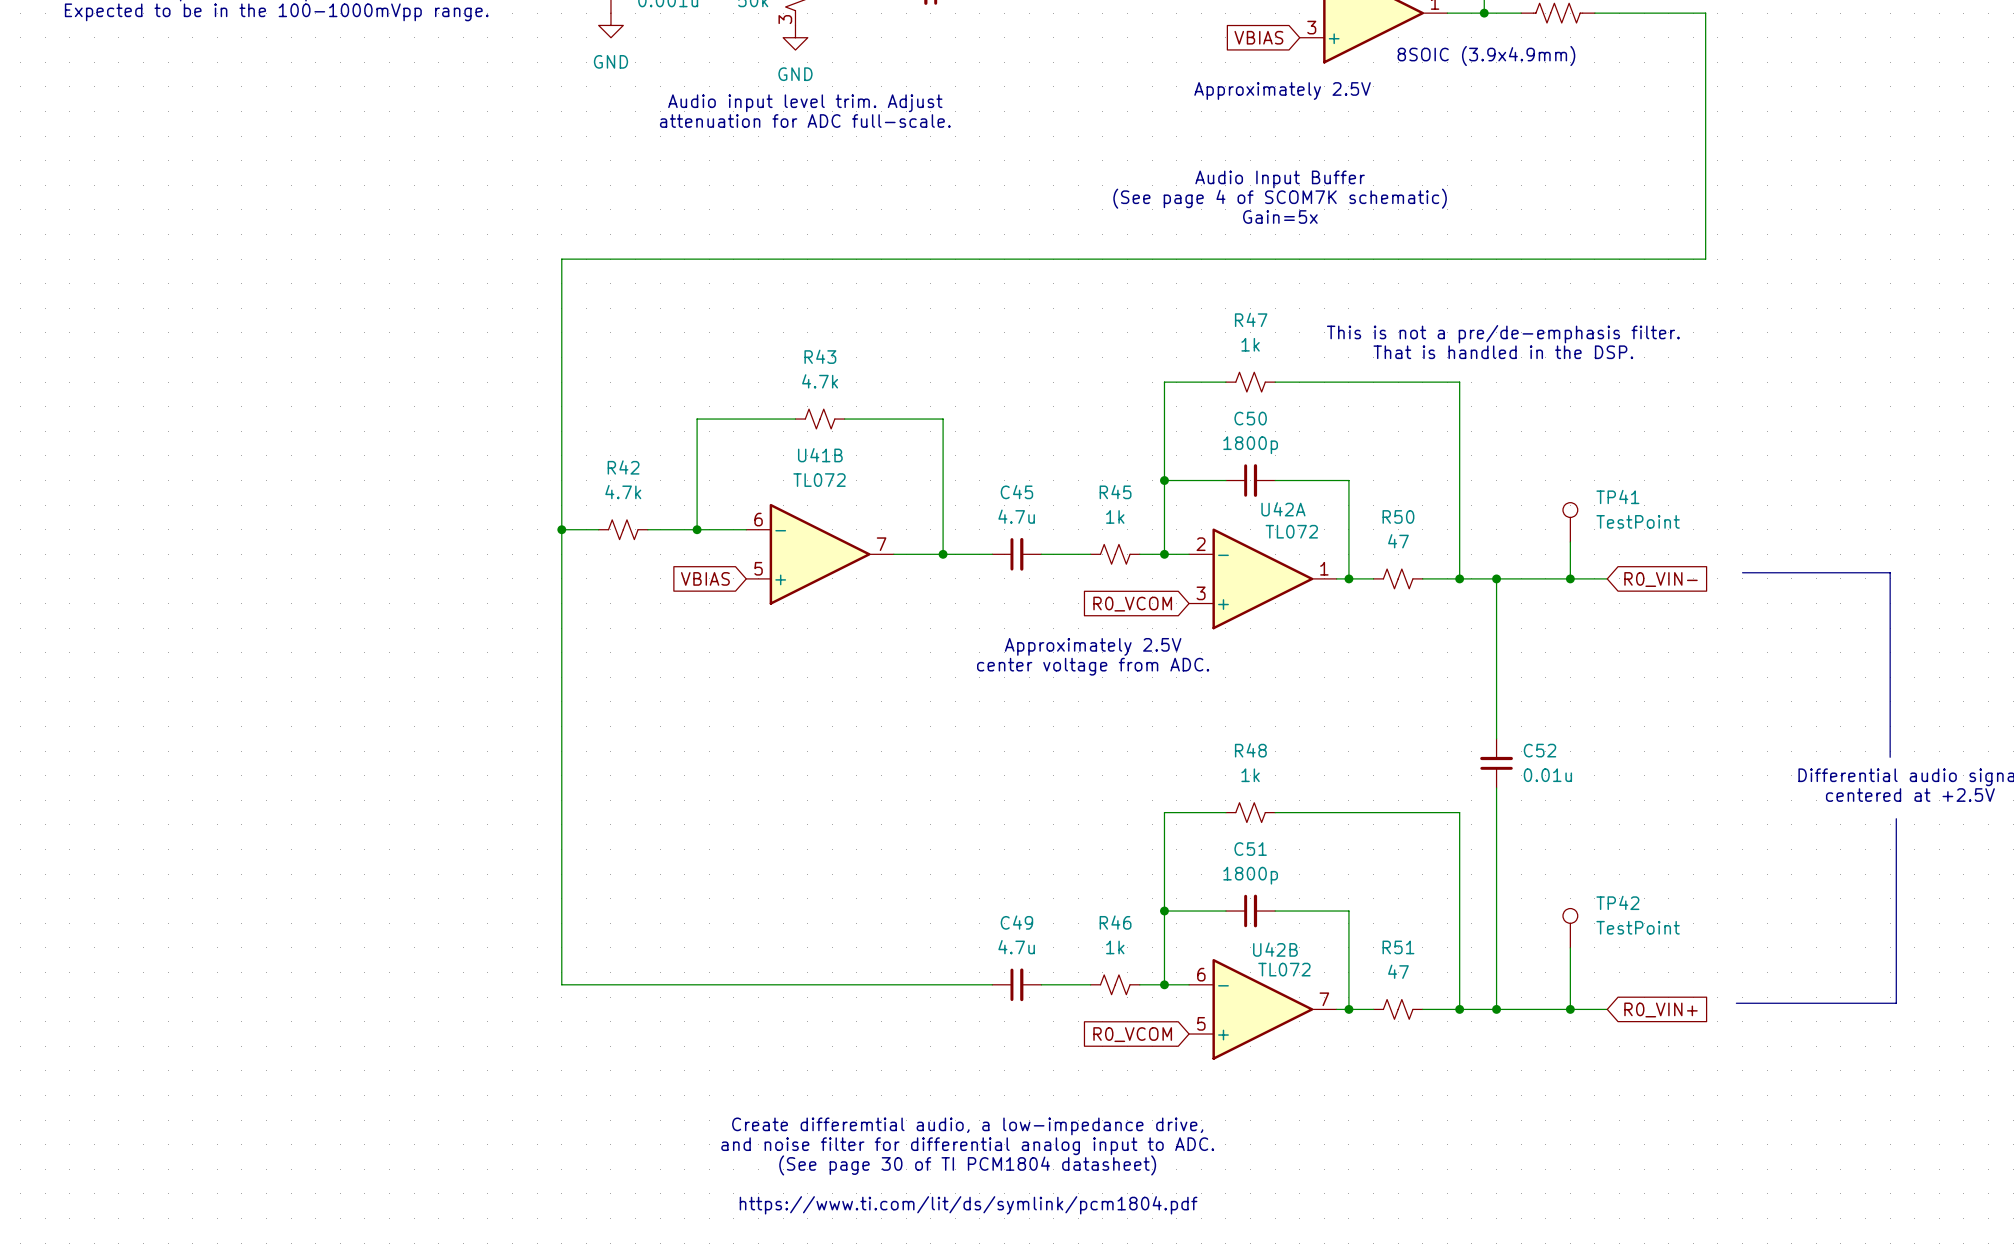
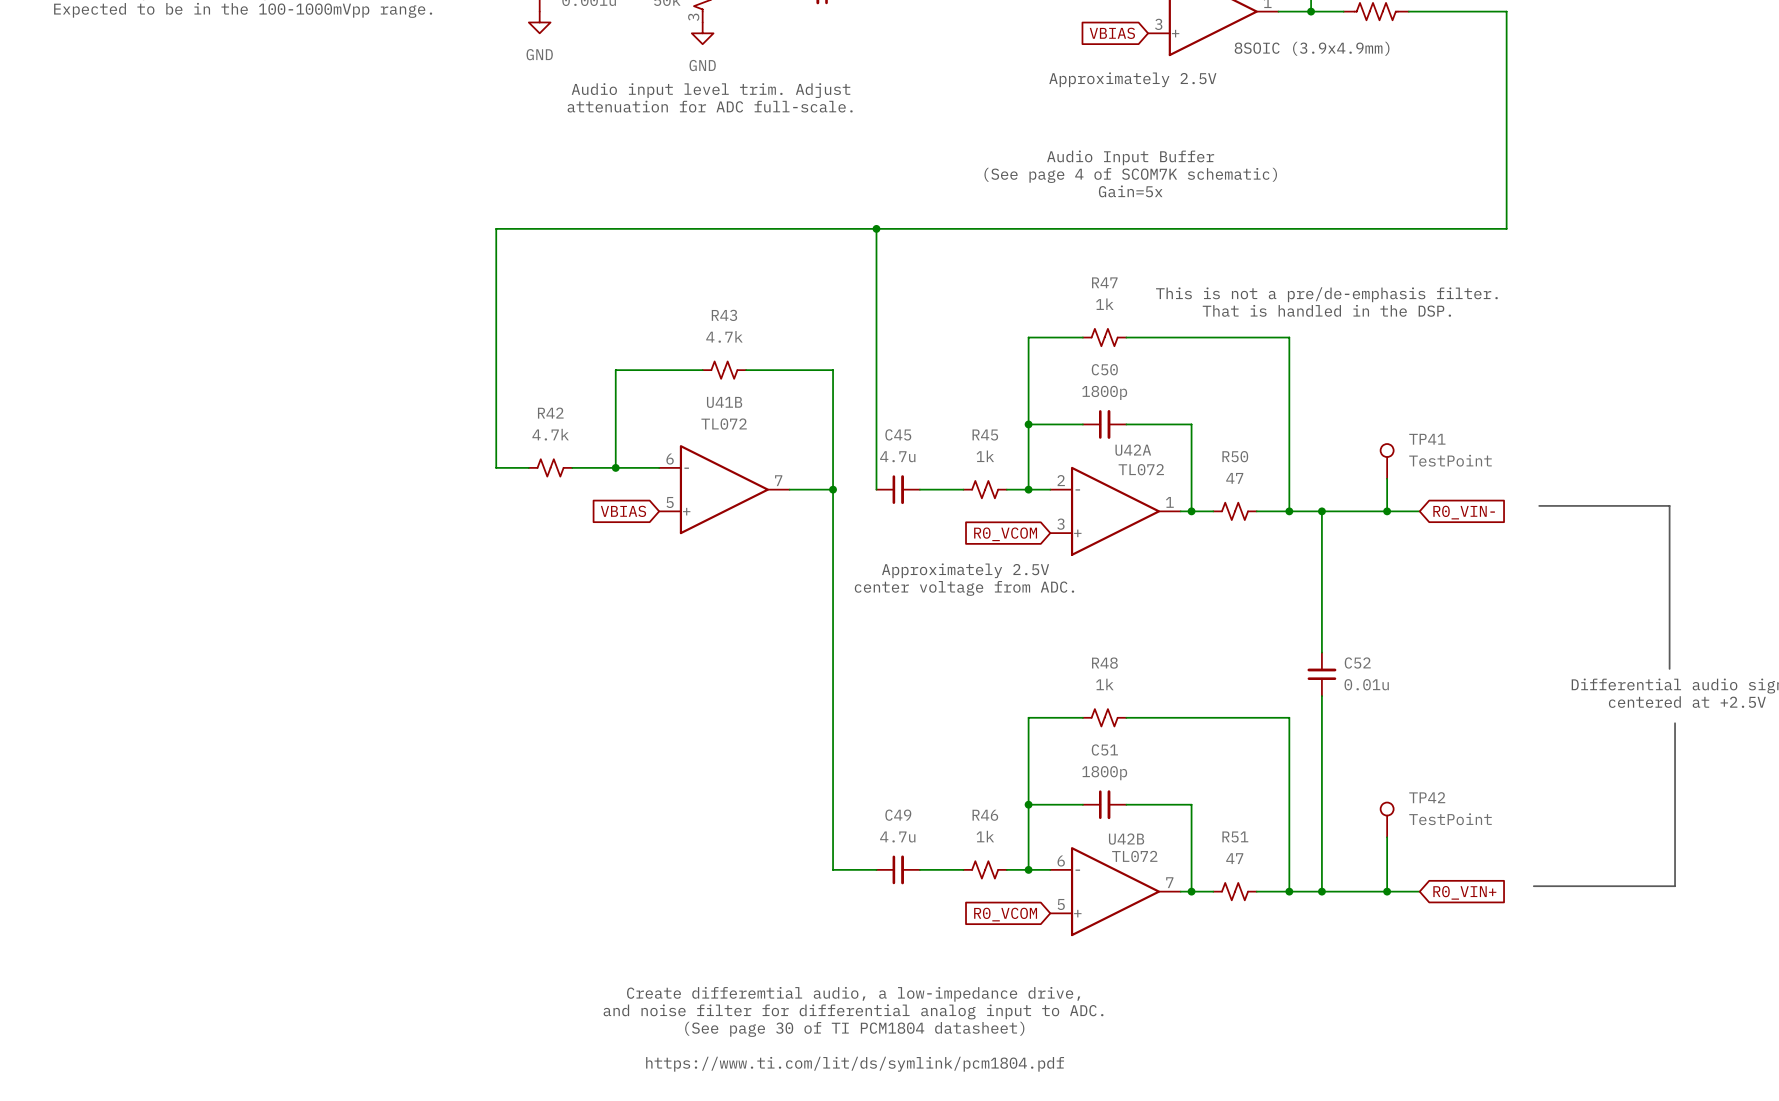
junction: none -> (876, 228)
wire: (561, 529) (561, 984) (943, 984) -> (833, 489) (833, 869)
junction: (561, 529) -> none
wire: (943, 554) (992, 554) -> (876, 228) (876, 489)

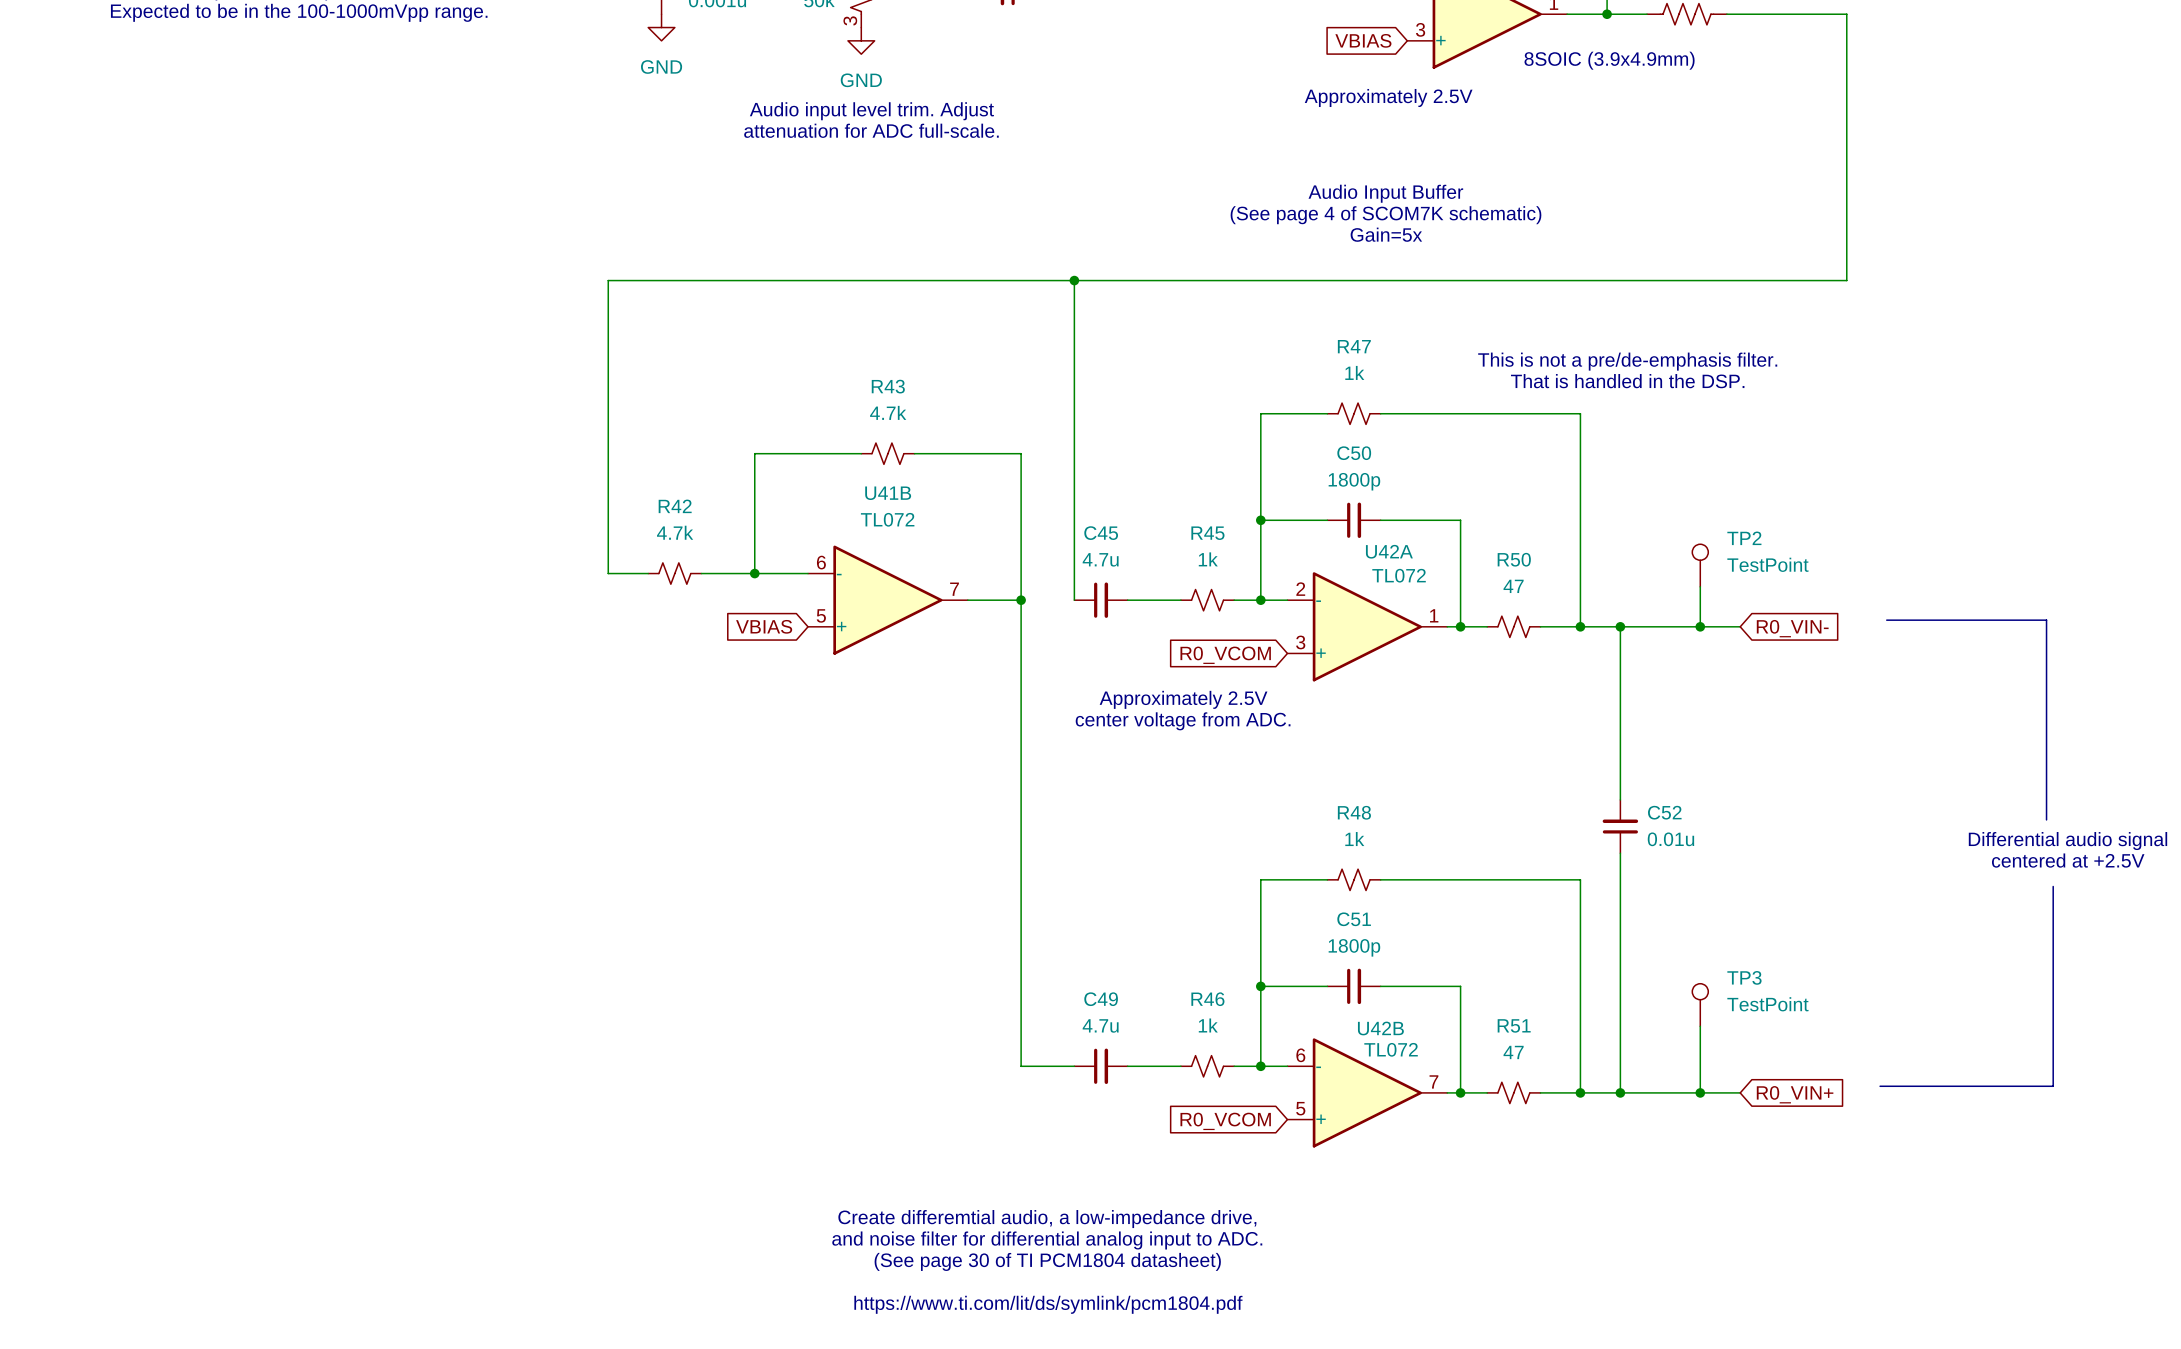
TP41 name: TP41 (1427, 439) -> TP2 (1744, 538)
TP42 name: TP42 (1427, 797) -> TP3 (1744, 977)

